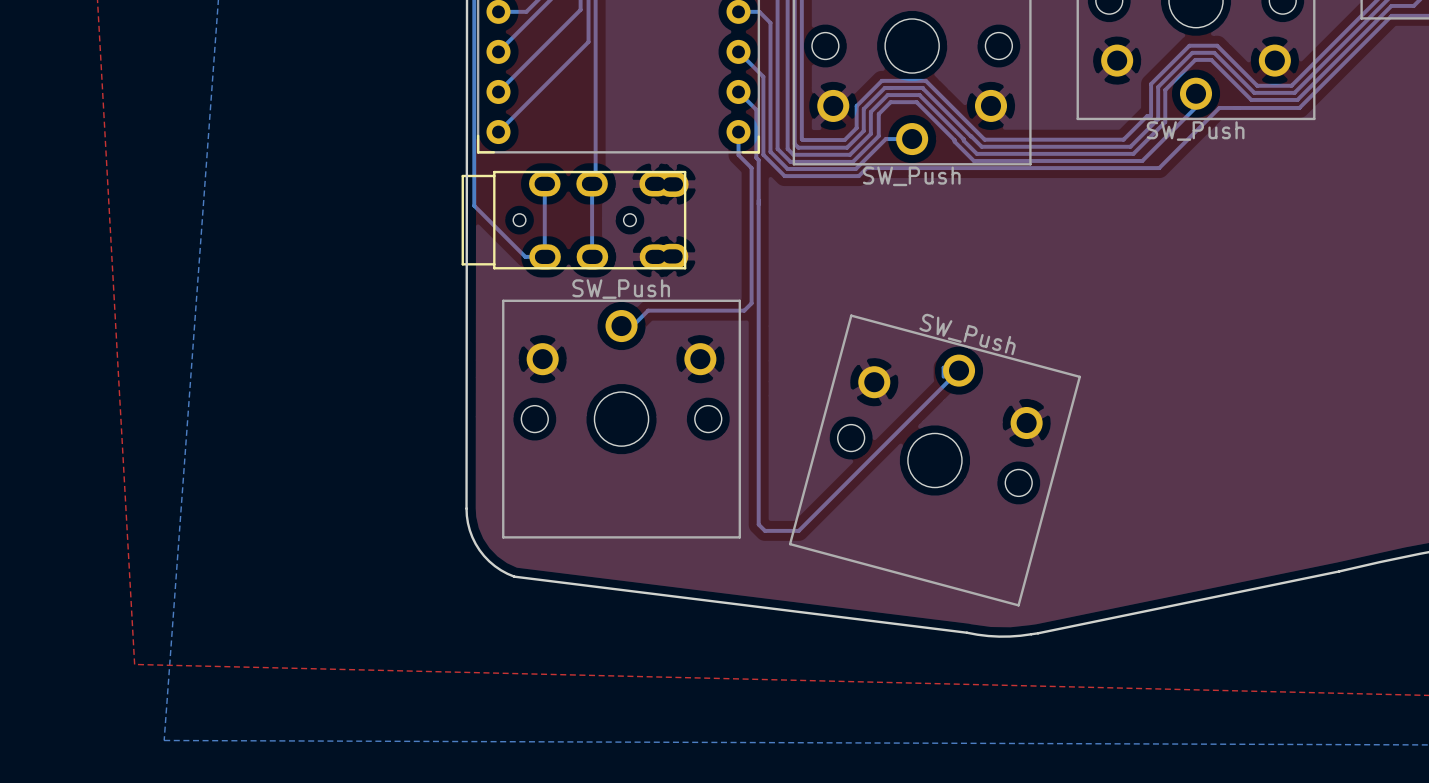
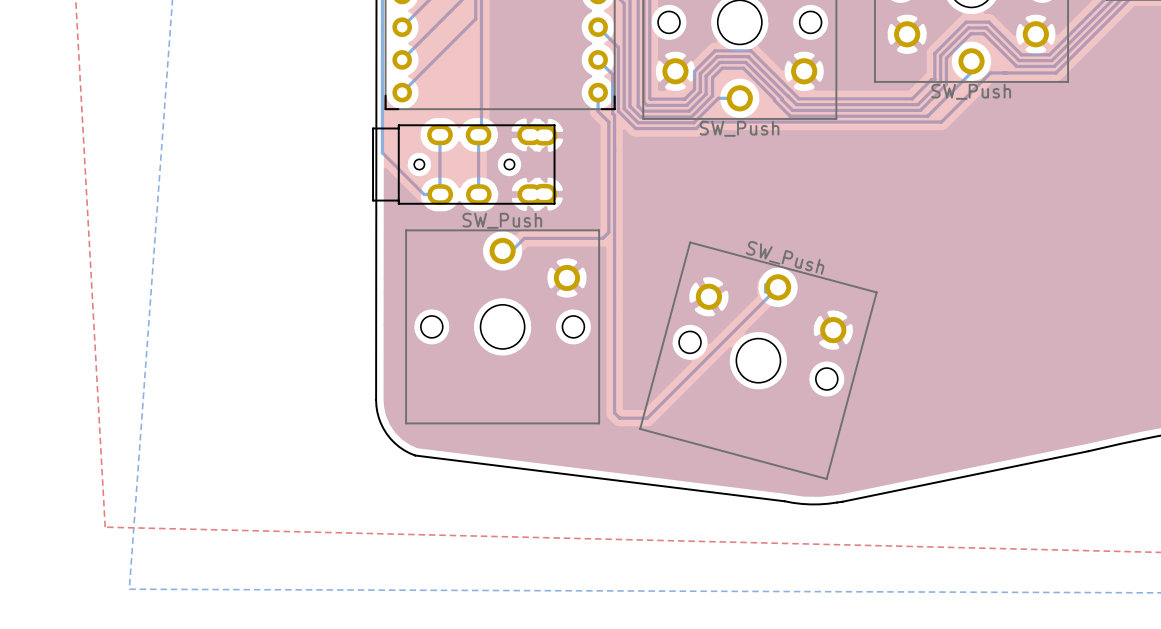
part footprint: [502, 299, 741, 539] -> [405, 229, 601, 425]

